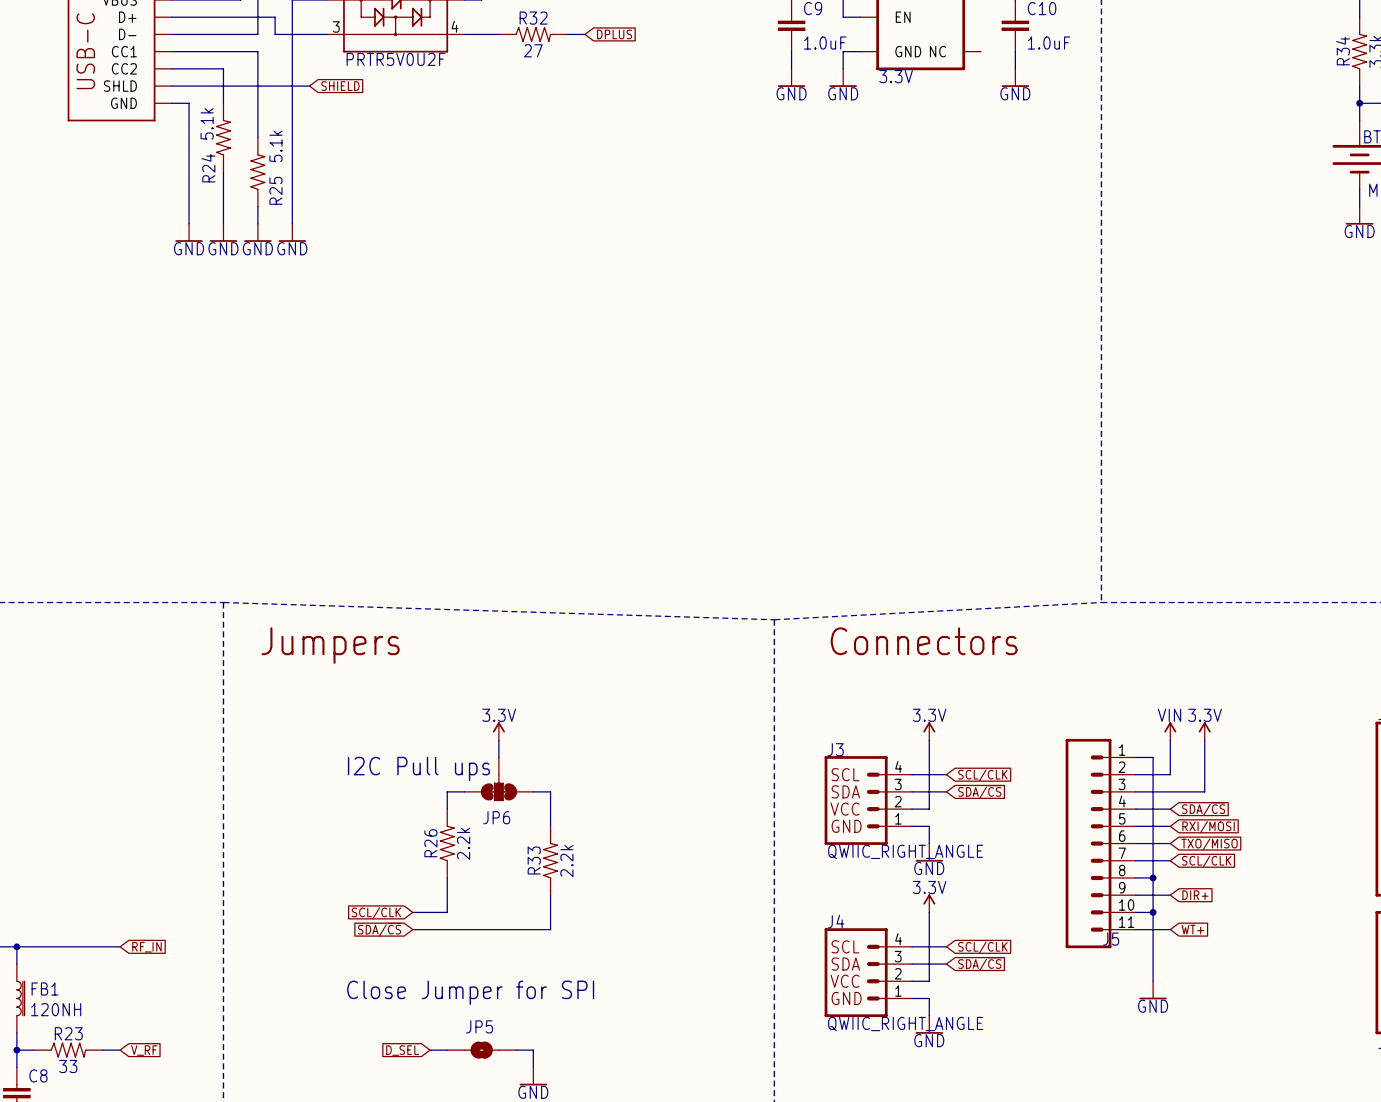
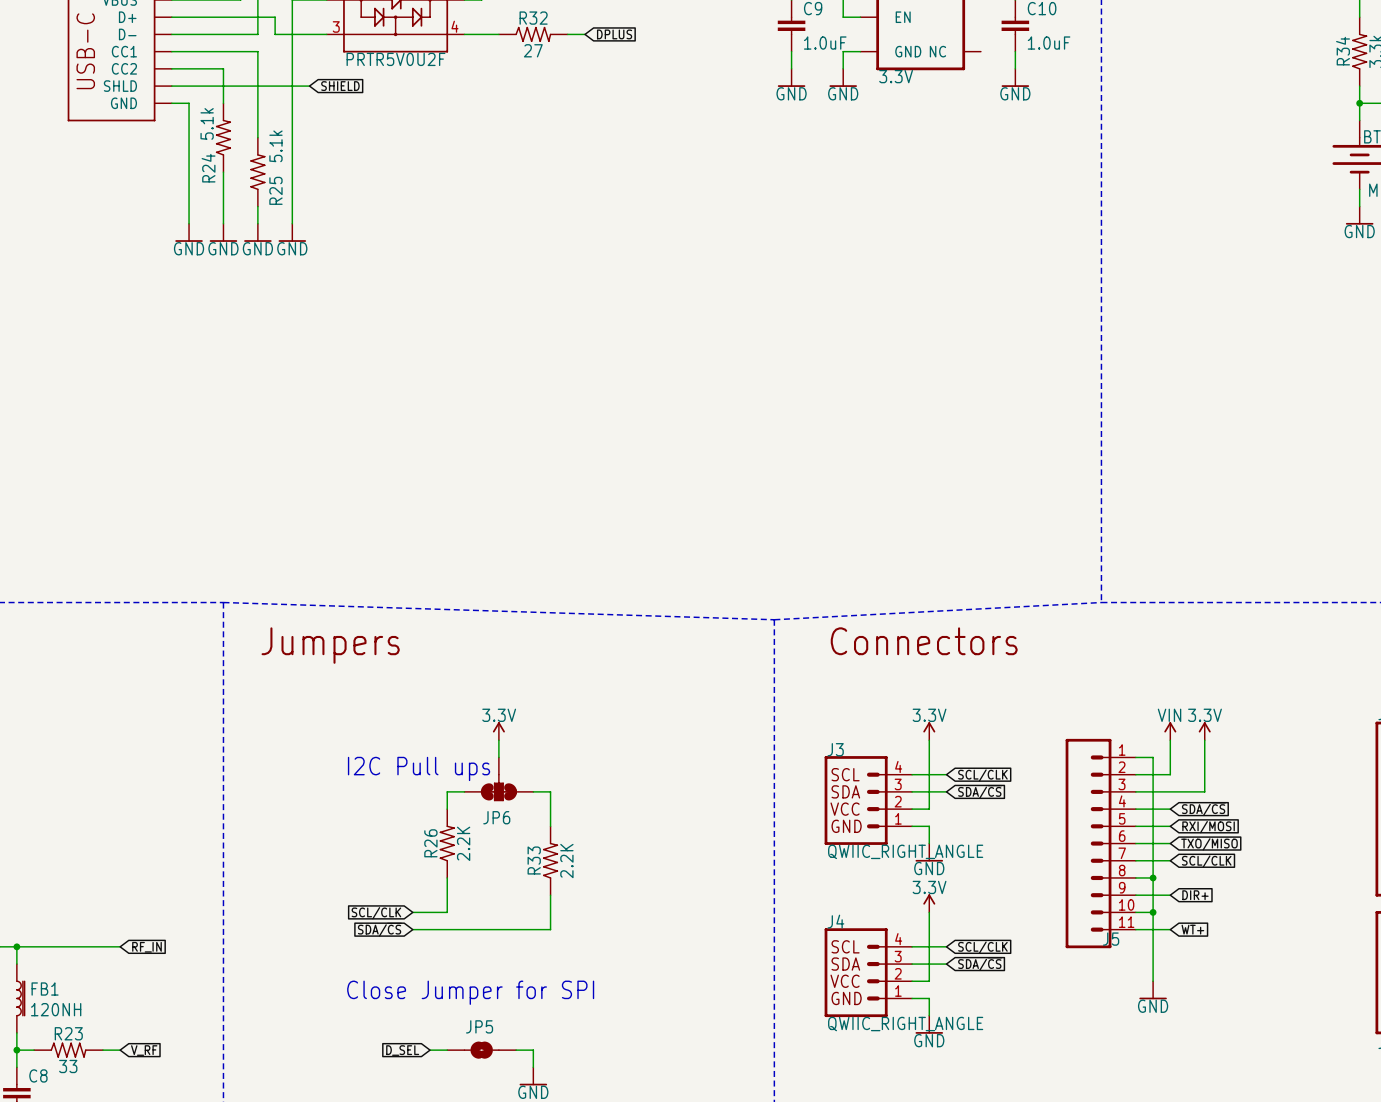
R26 value: 2.2k (463, 843) -> 2.2K (463, 843)
R33 value: 2.2k (566, 861) -> 2.2K (566, 861)

